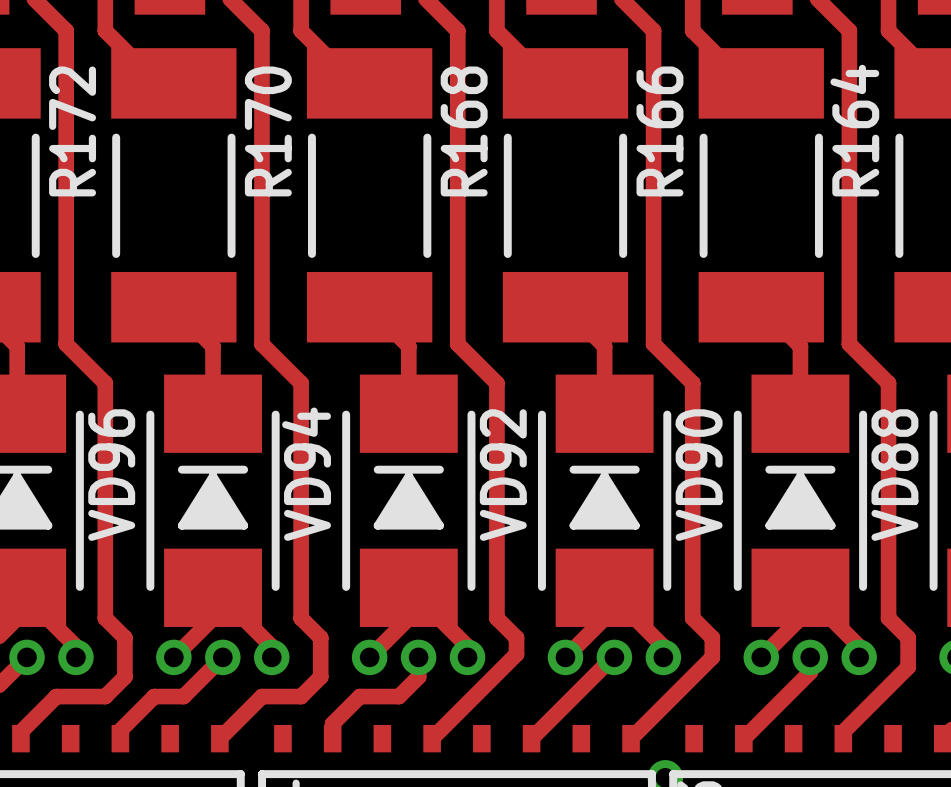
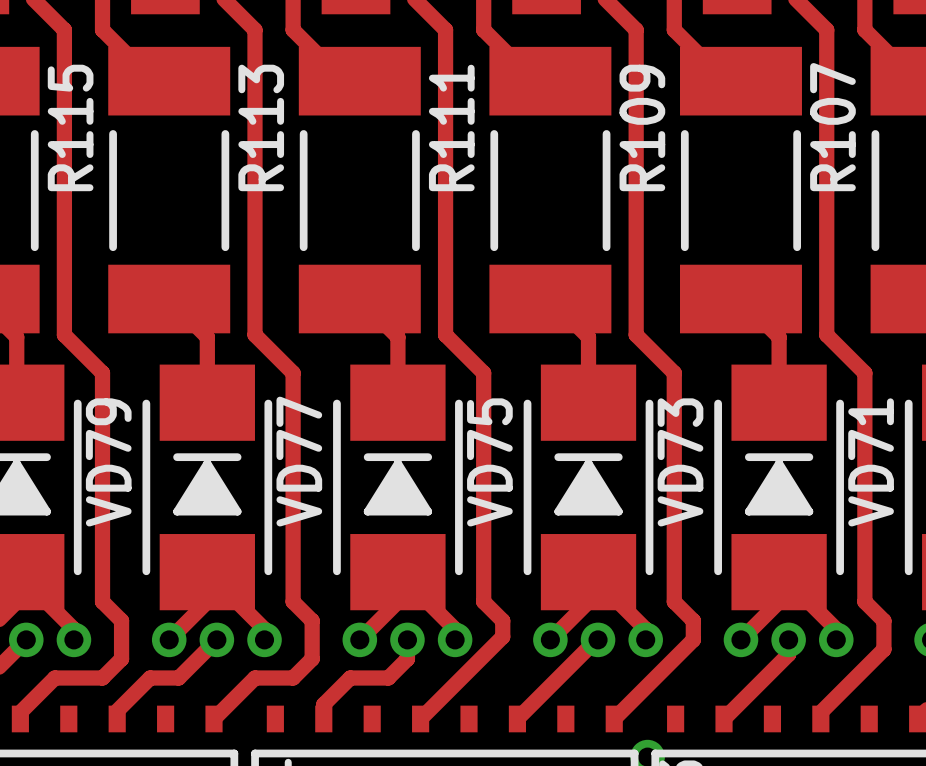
R164 name: R164 (854, 130) -> R107 (832, 127)
R172 name: R172 (72, 131) -> R115 (70, 127)
R170 name: R170 (268, 131) -> R113 (261, 127)
R168 name: R168 (464, 131) -> R111 (451, 127)
R166 name: R166 (659, 131) -> R109 (642, 127)
VD94 name: VD94 (306, 474) -> VD77 (299, 461)
VD96 name: VD96 (111, 475) -> VD79 (108, 462)
VD92 name: VD92 (503, 475) -> VD75 (489, 462)
VD90 name: VD90 (699, 475) -> VD73 (680, 462)
VD88 name: VD88 (894, 475) -> VD71 (871, 462)

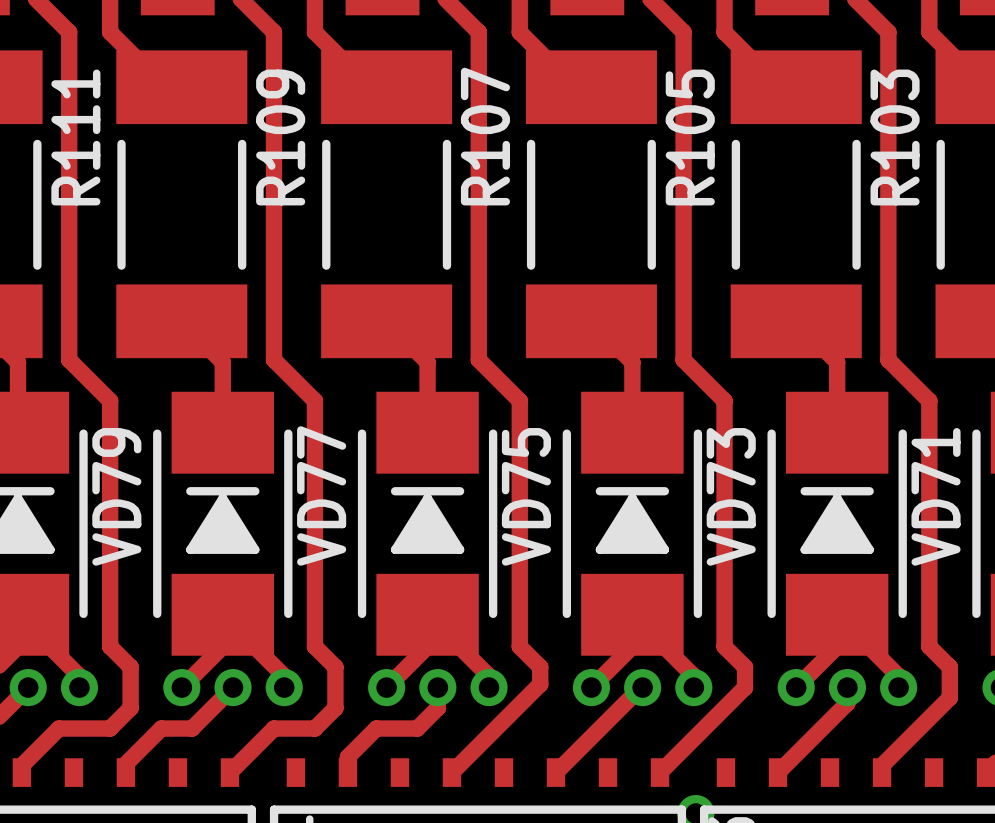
R115 name: R115 (70, 127) -> R111 (75, 137)
R113 name: R113 (261, 127) -> R109 (280, 137)
R111 name: R111 (451, 127) -> R107 (485, 136)
R109 name: R109 (642, 127) -> R105 (690, 137)
R107 name: R107 (832, 127) -> R103 (895, 137)

